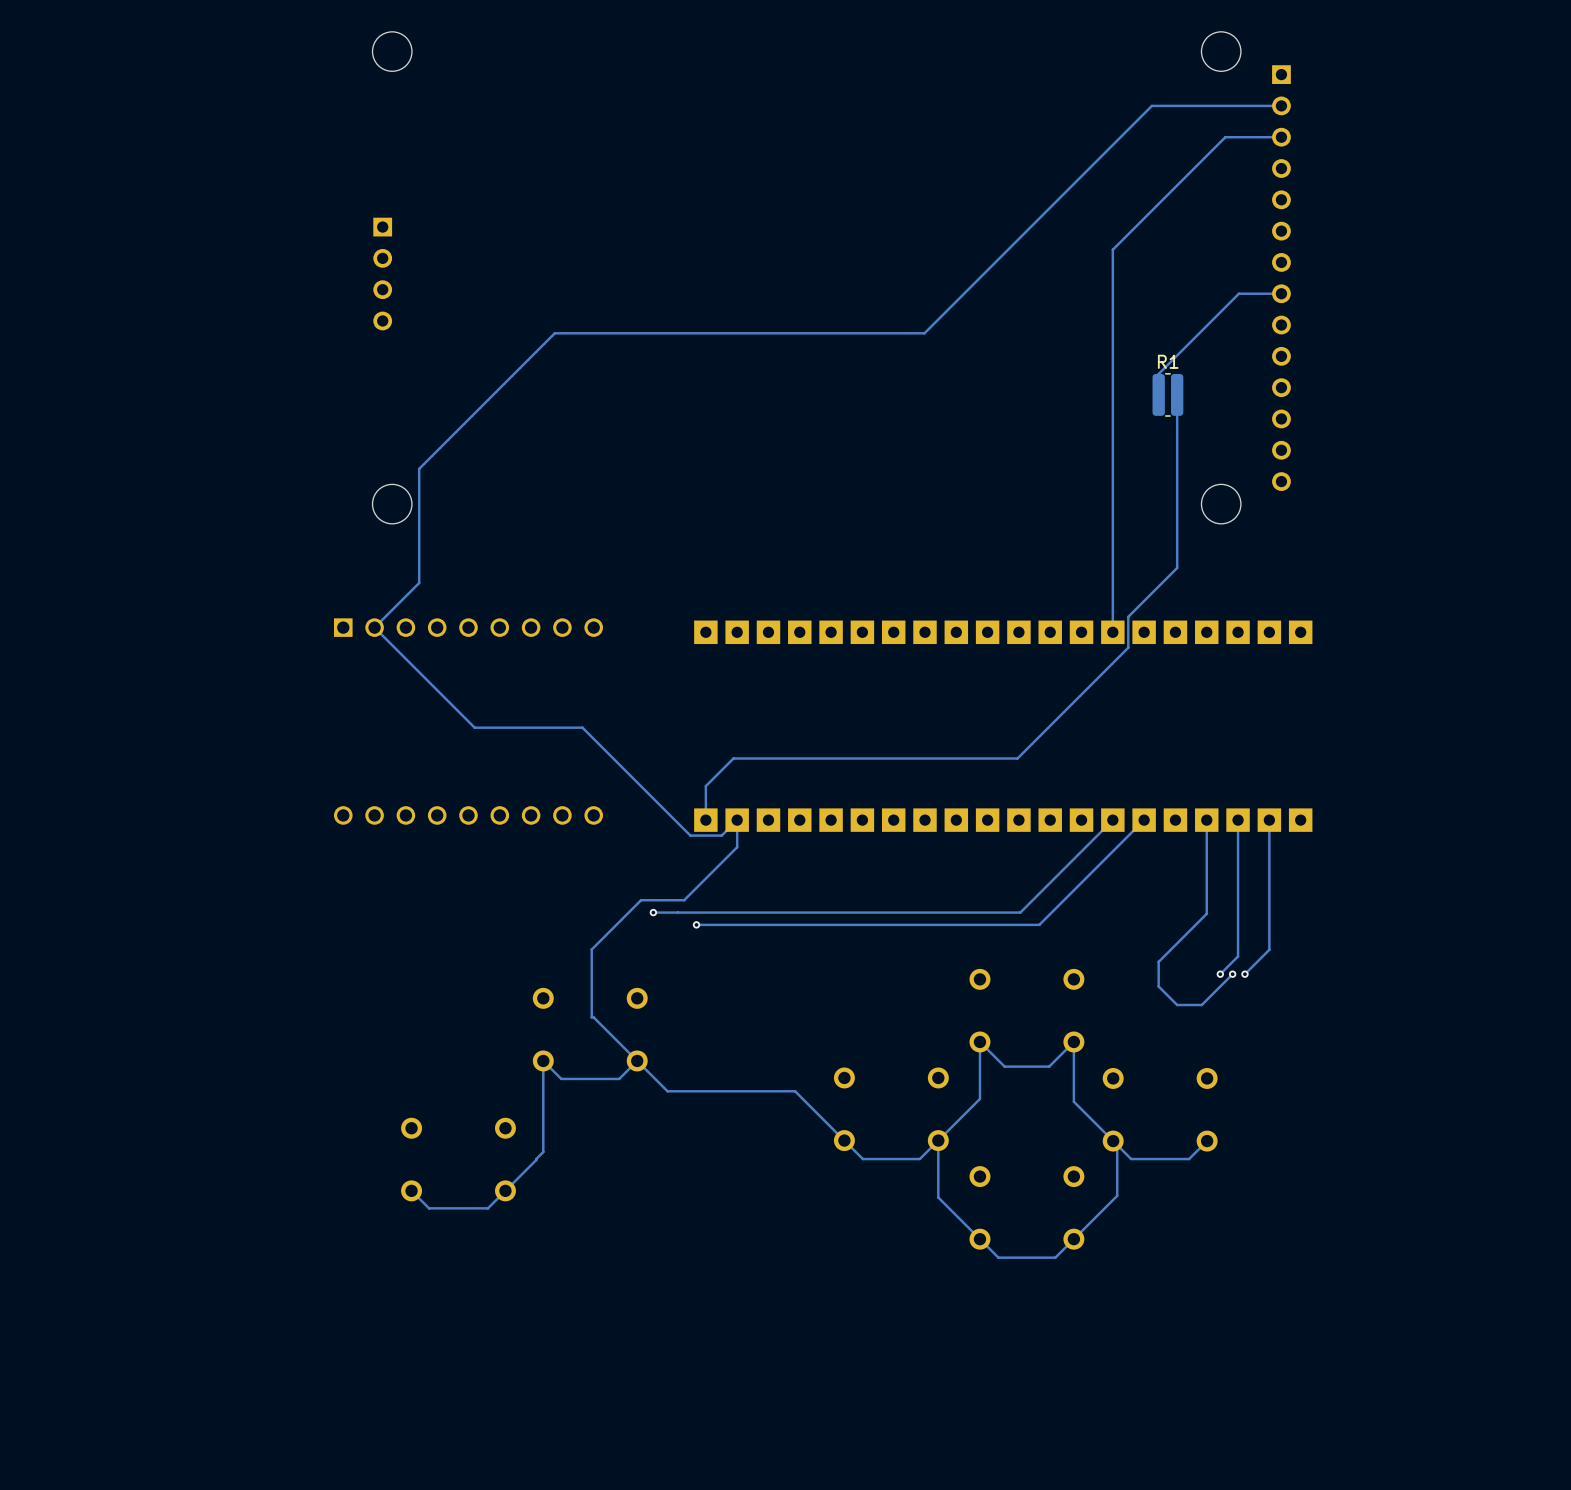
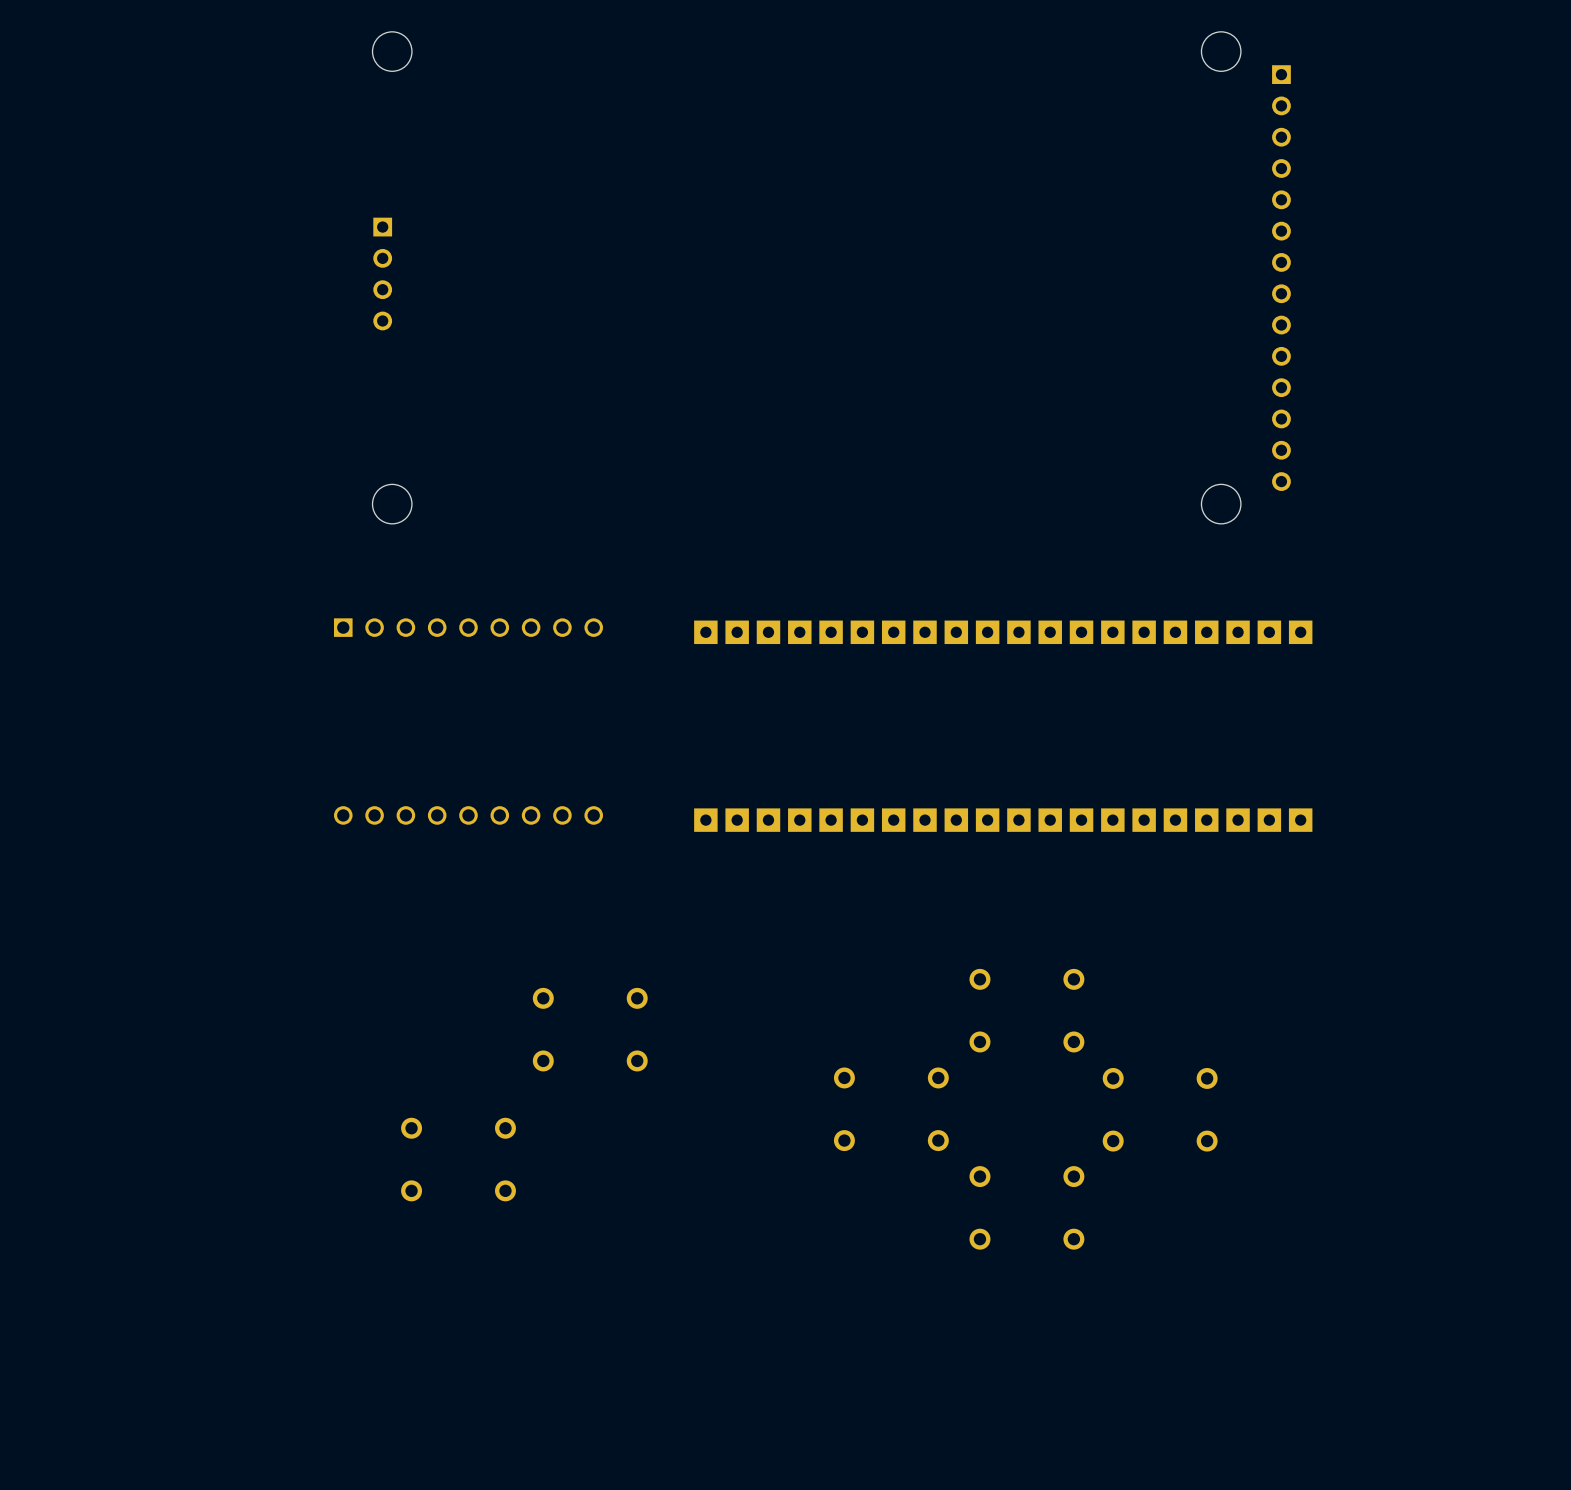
track: (1281, 105) (1151, 105) (924, 333) (554, 333) (419, 468) (419, 583) (374, 627) (474, 727) (582, 727) (690, 835) (721, 835) (737, 820) (737, 847) (684, 900) (641, 900) (591, 949) (591, 1017) (667, 1091) (795, 1091) (862, 1159) (919, 1159) (979, 1098) (979, 1041) (1004, 1066) (1049, 1066) (1073, 1041) (1073, 1101) (1131, 1159) (1189, 1159) (1207, 1141) -> none
track: (1281, 137) (1225, 137) (1112, 249) (1112, 632) -> none
track: (1281, 293) (1238, 293) (1158, 373) (1158, 394) -> none
R1: (1167, 394) -> none
track: (1177, 394) (1177, 567) (1128, 616) (1128, 647) (1017, 758) (733, 758) (705, 786) (705, 820) -> none
track: (1112, 820) (1020, 912) (653, 912) -> none
track: (1144, 820) (1039, 924) (696, 924) -> none
track: (1206, 820) (1206, 913) (1158, 961) (1158, 986) (1177, 1005) (1201, 1005) (1232, 974) -> none
track: (1238, 820) (1238, 956) (1220, 974) -> none
track: (1269, 820) (1269, 949) (1244, 974) -> none
via: (653, 912) -> none
via: (696, 924) -> none
via: (1220, 974) -> none
via: (1232, 974) -> none
via: (1244, 974) -> none
track: (637, 1060) (619, 1078) (561, 1078) (543, 1060) (543, 1152) (487, 1208) (429, 1208) (411, 1190) -> none
track: (938, 1140) (938, 1197) (998, 1257) (1055, 1257) (1117, 1195) (1117, 1145) -> none

